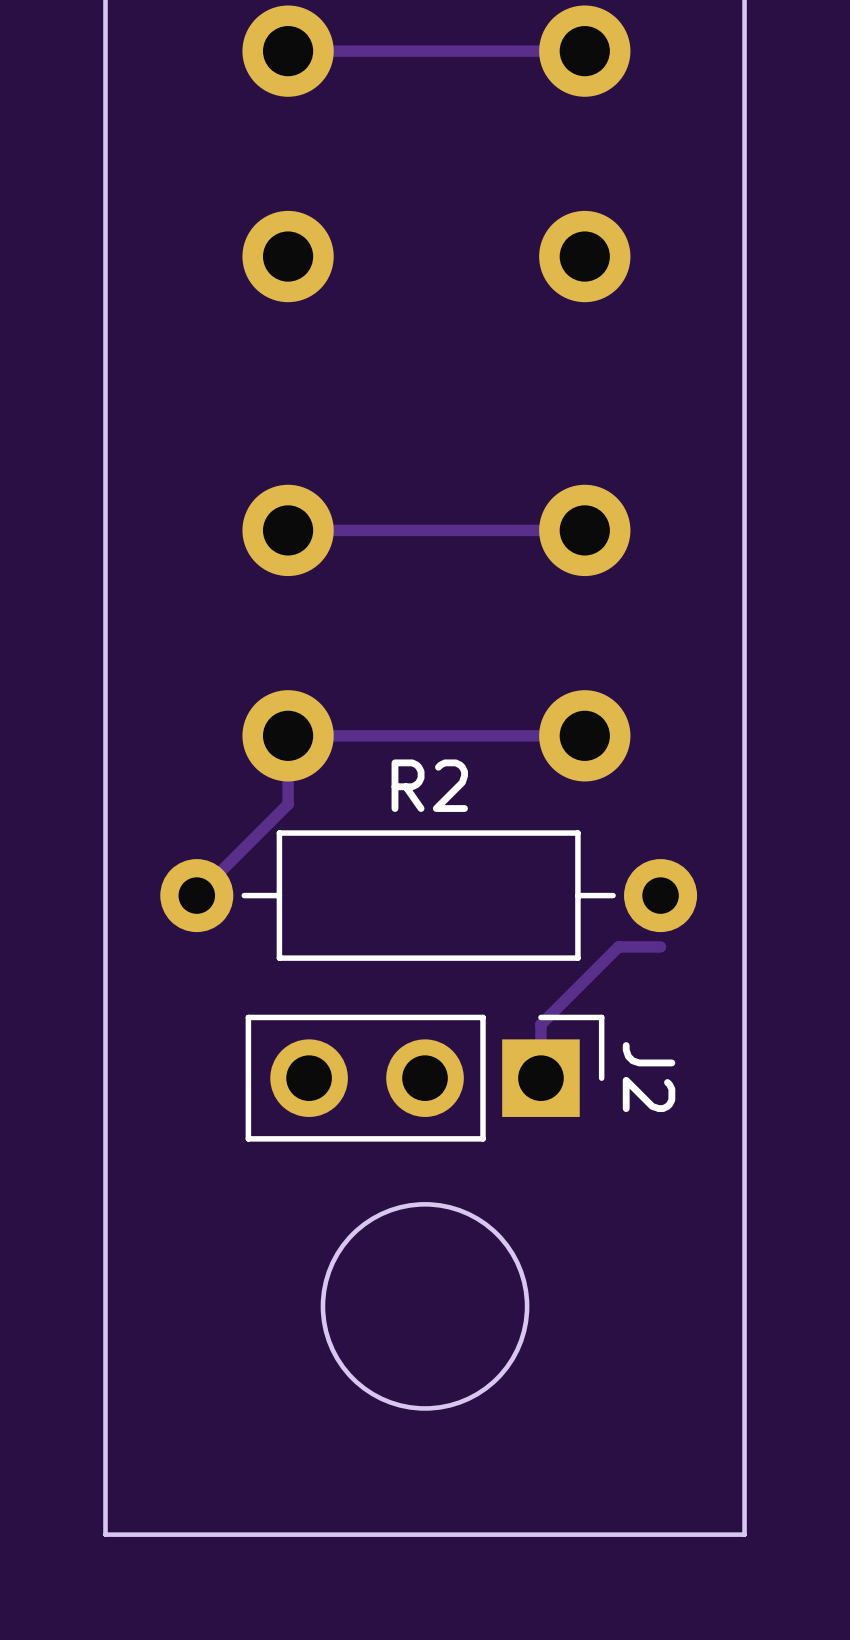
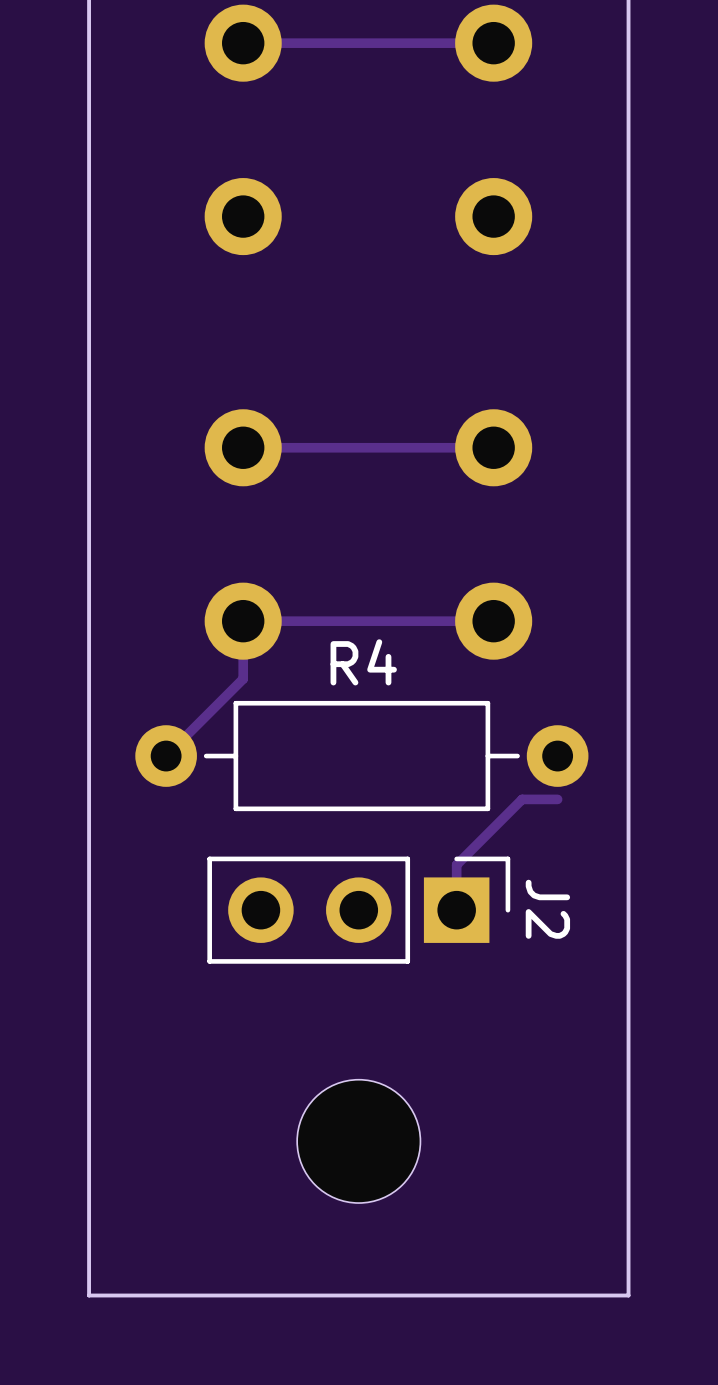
R2 name: R2 (429, 785) -> R4 (363, 662)
round board edge: [320, 1202, 530, 1411] -> none
part: none -> (358, 1141)

